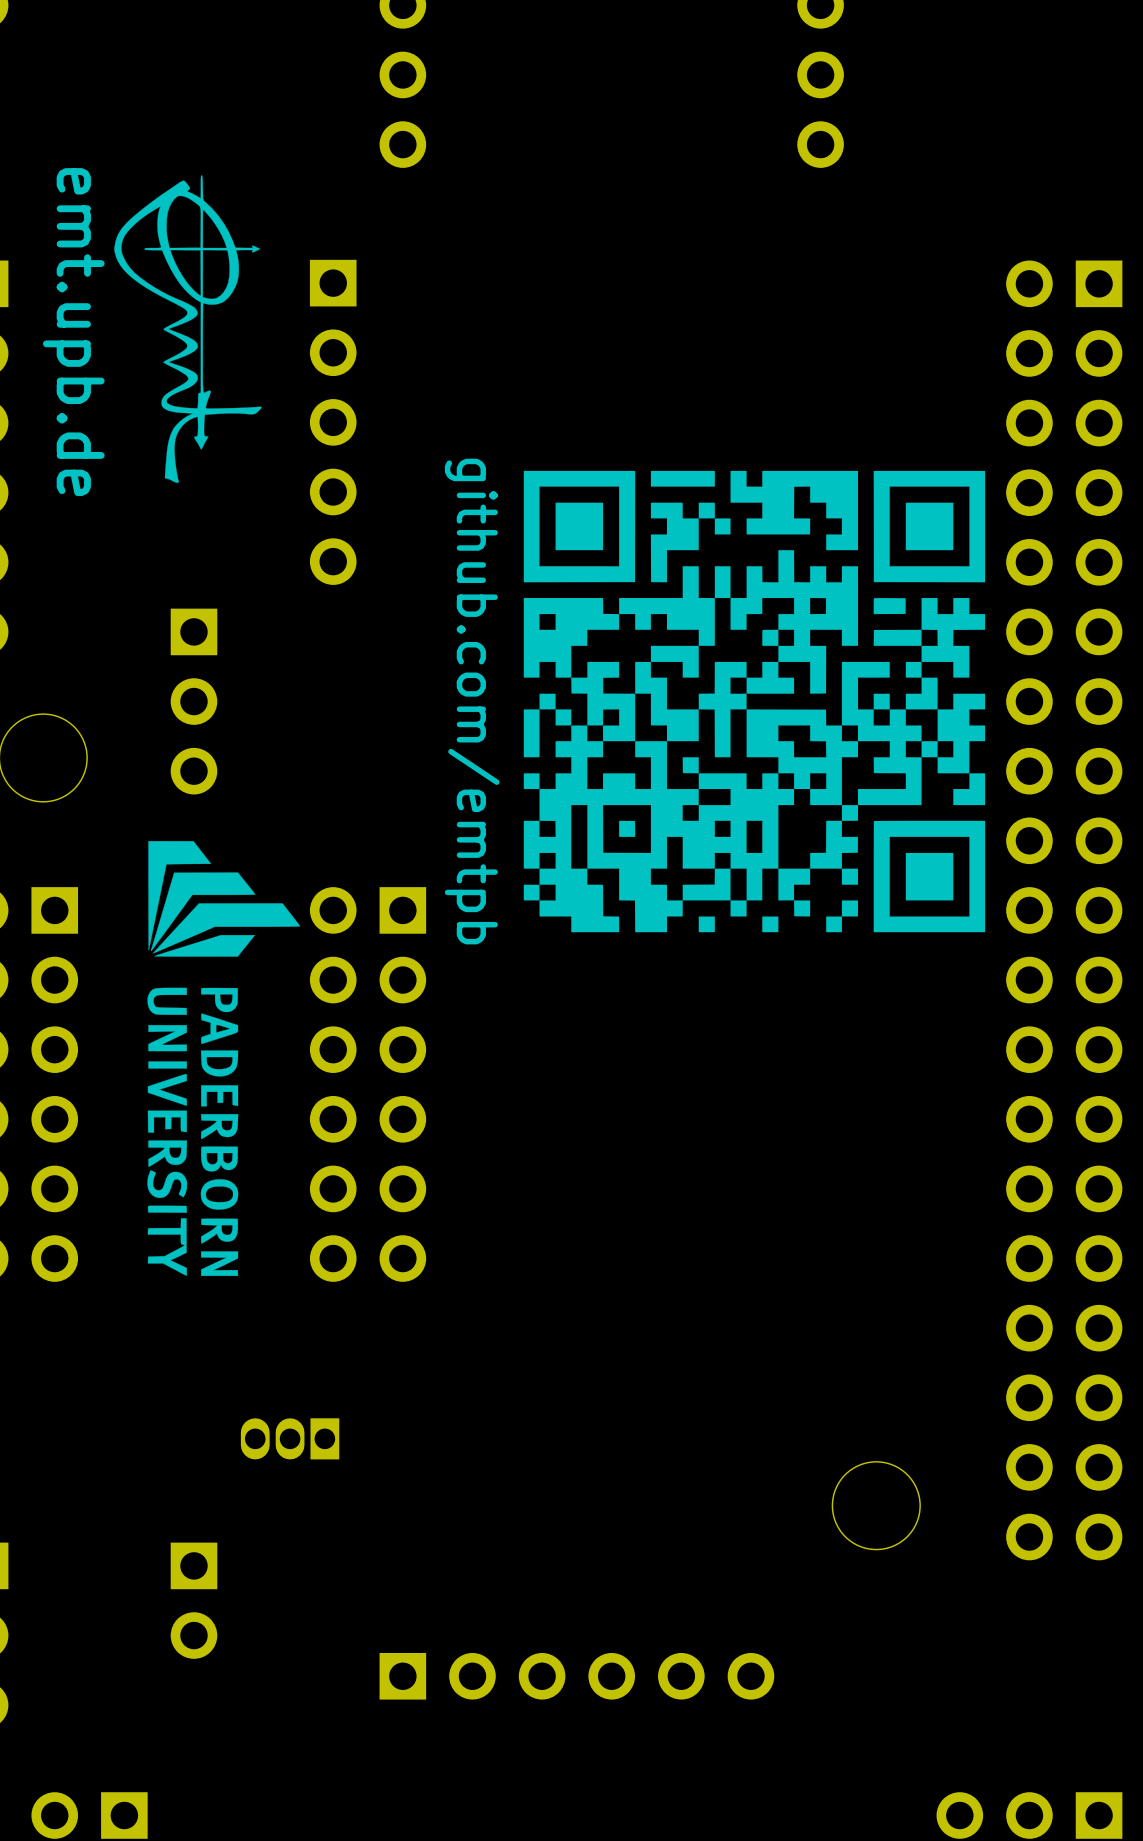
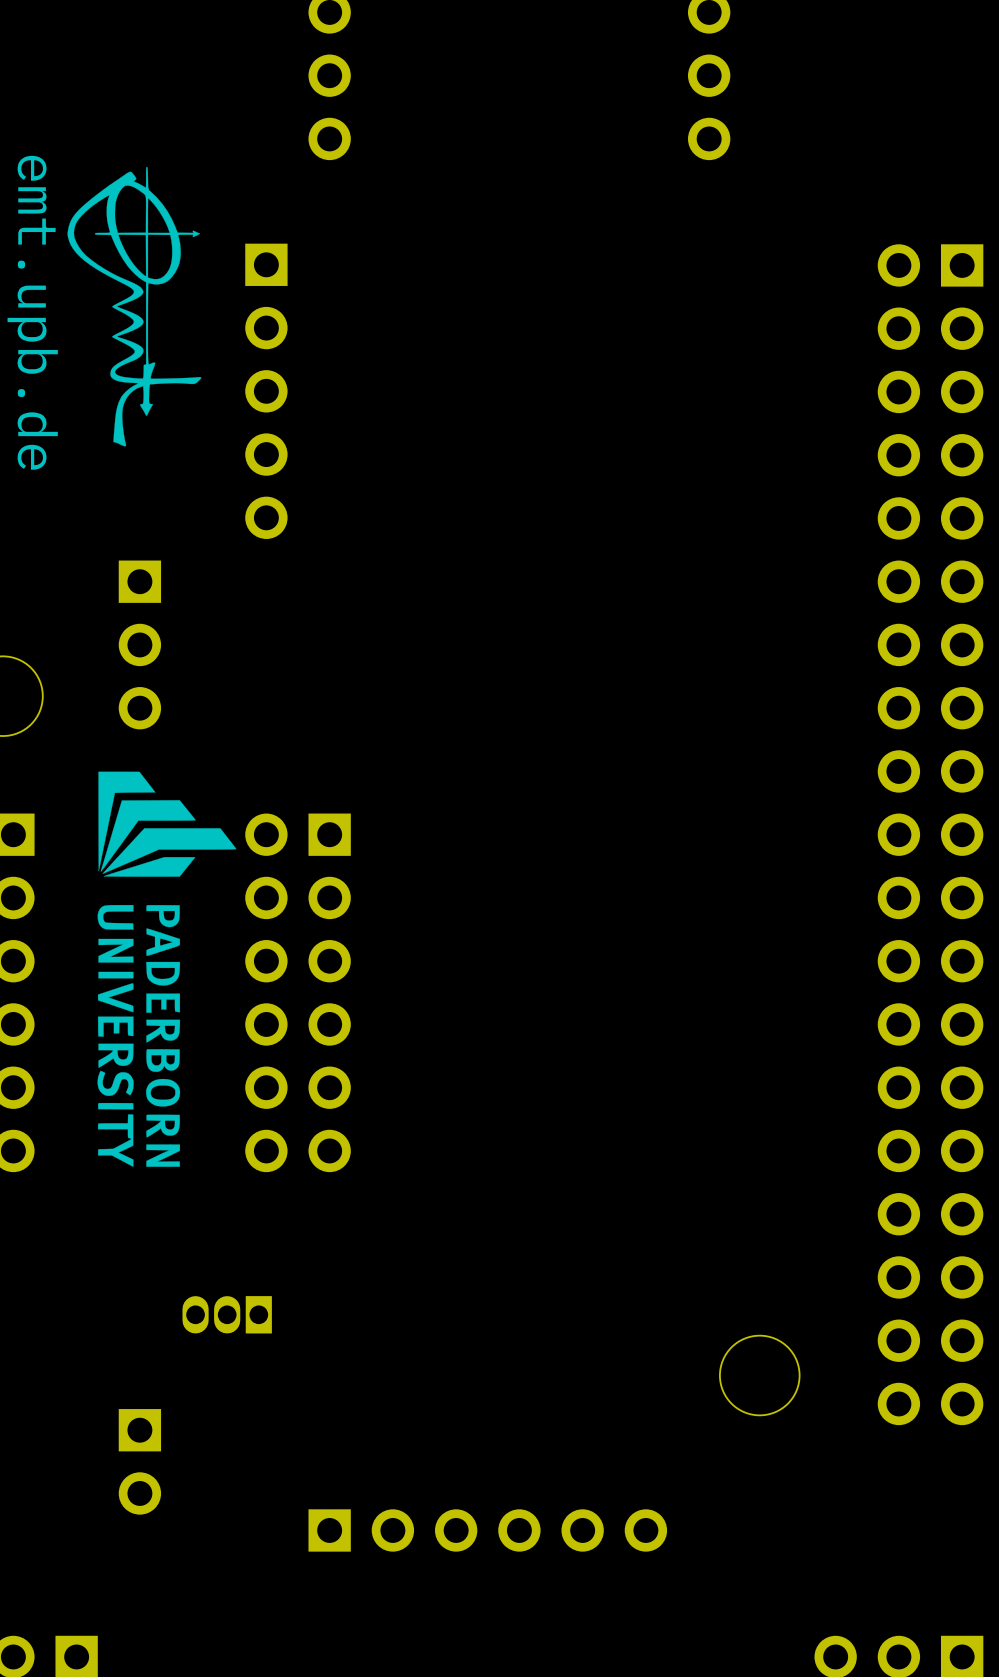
drawing: [523, 470, 986, 933] -> none

